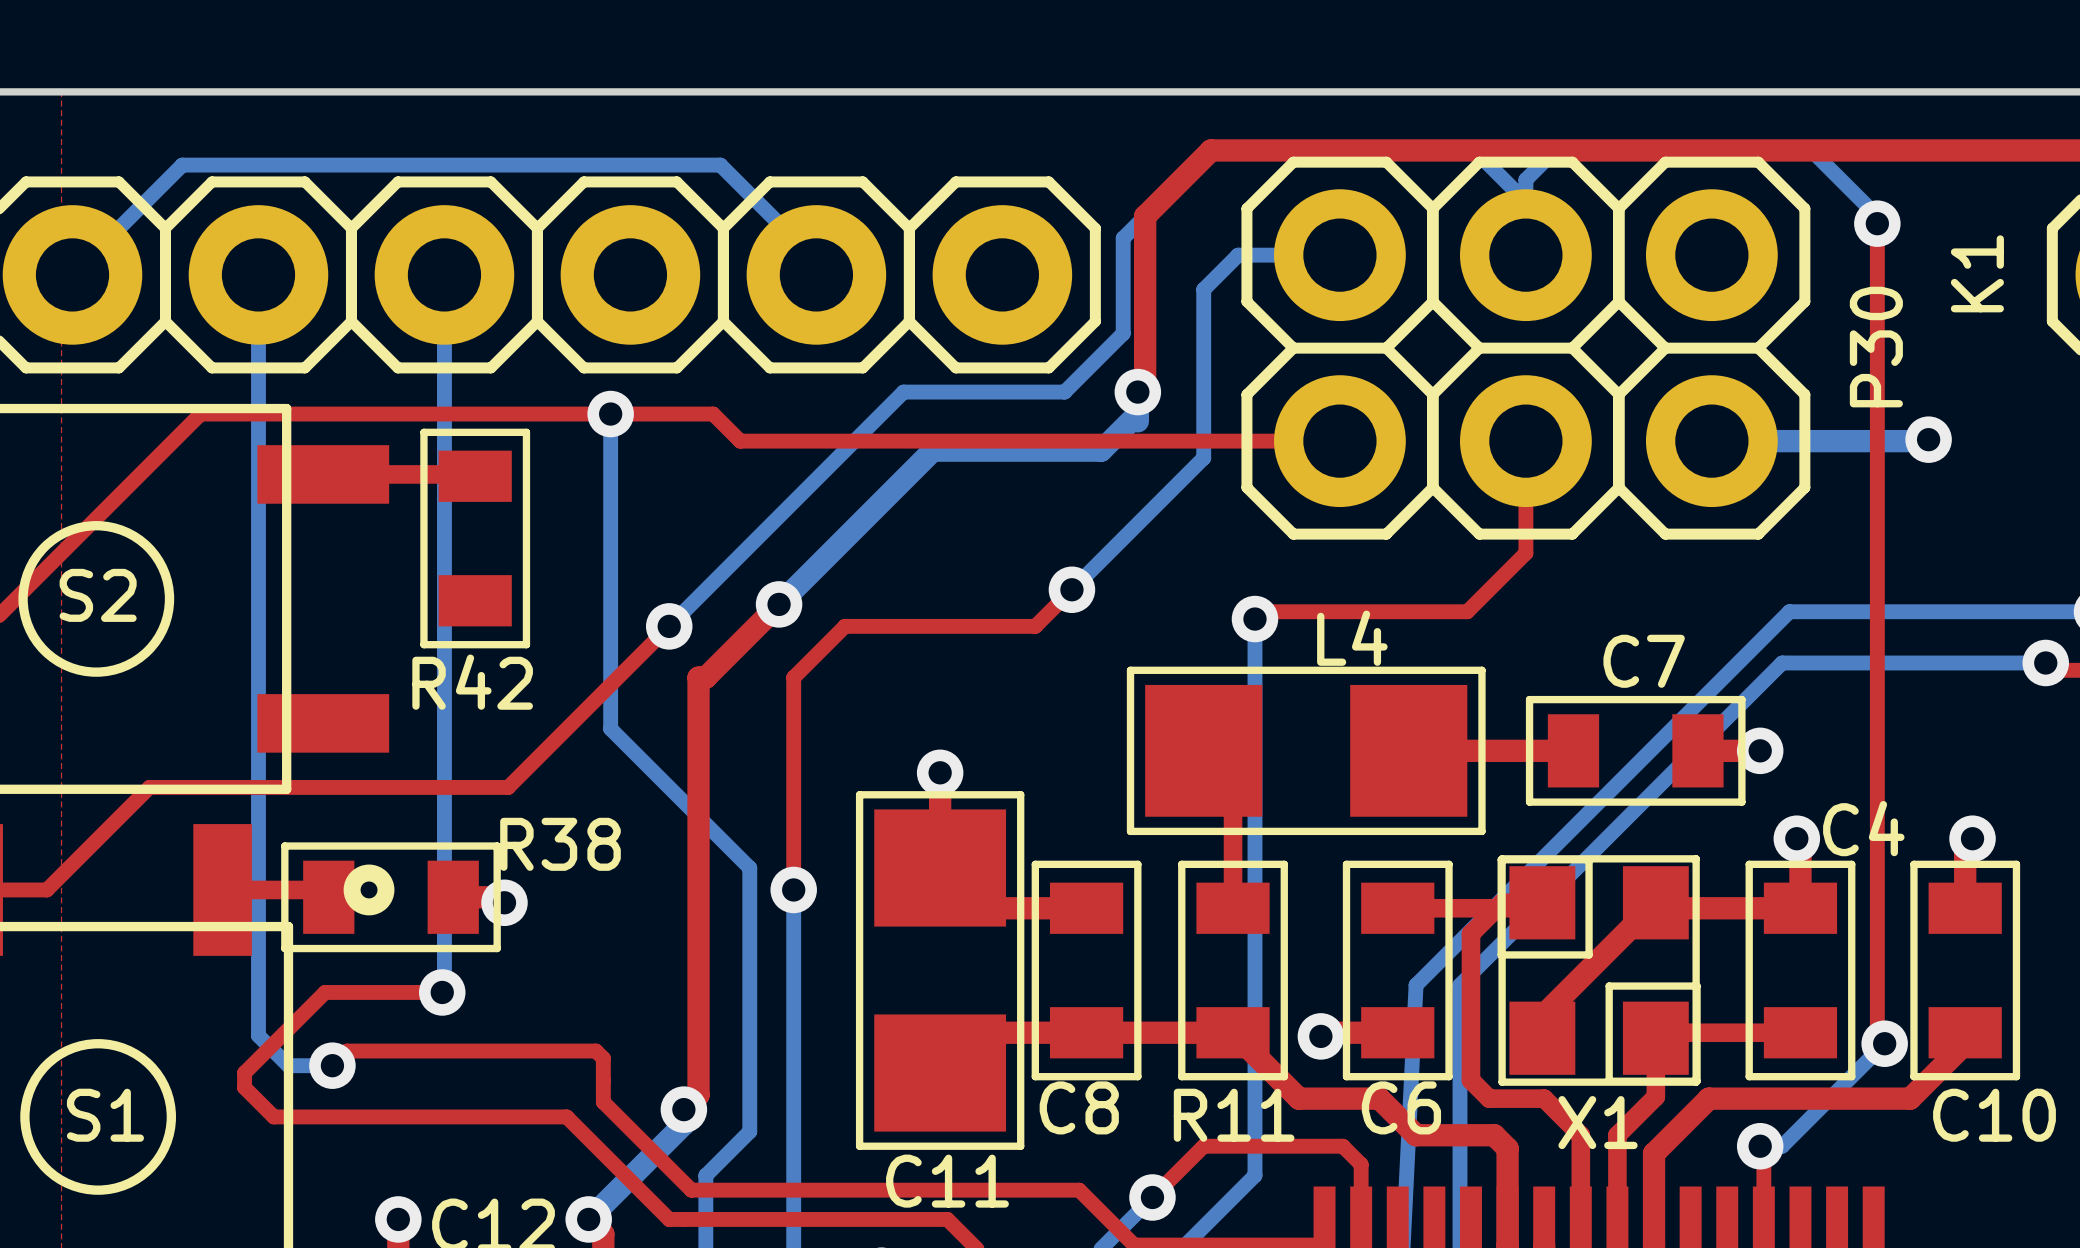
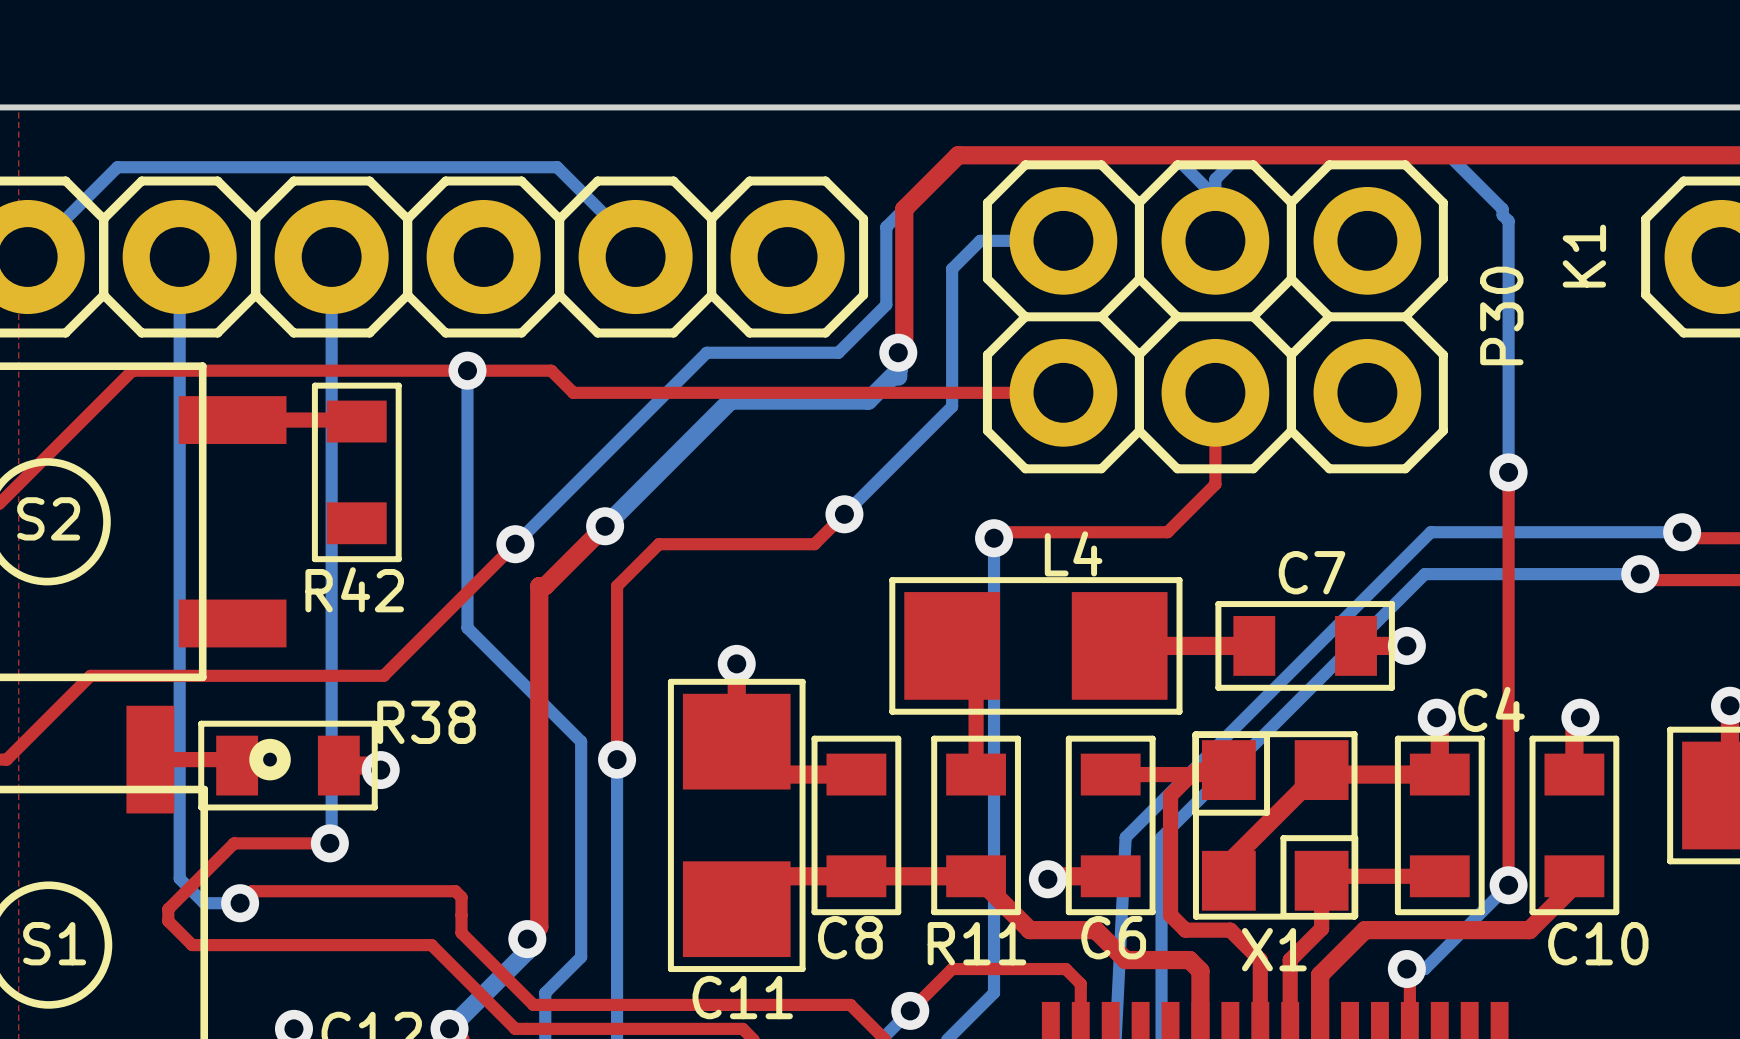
bottom track: none -> (1502, 215) (1508, 221) (1508, 472)
top track: (1877, 223) (1877, 1036) -> none
via: (1877, 223) -> none
bottom track: (1928, 439) (1711, 441) -> none
via position: (1928, 439) -> (1508, 472)
top track: none -> (1508, 472) (1508, 885)

